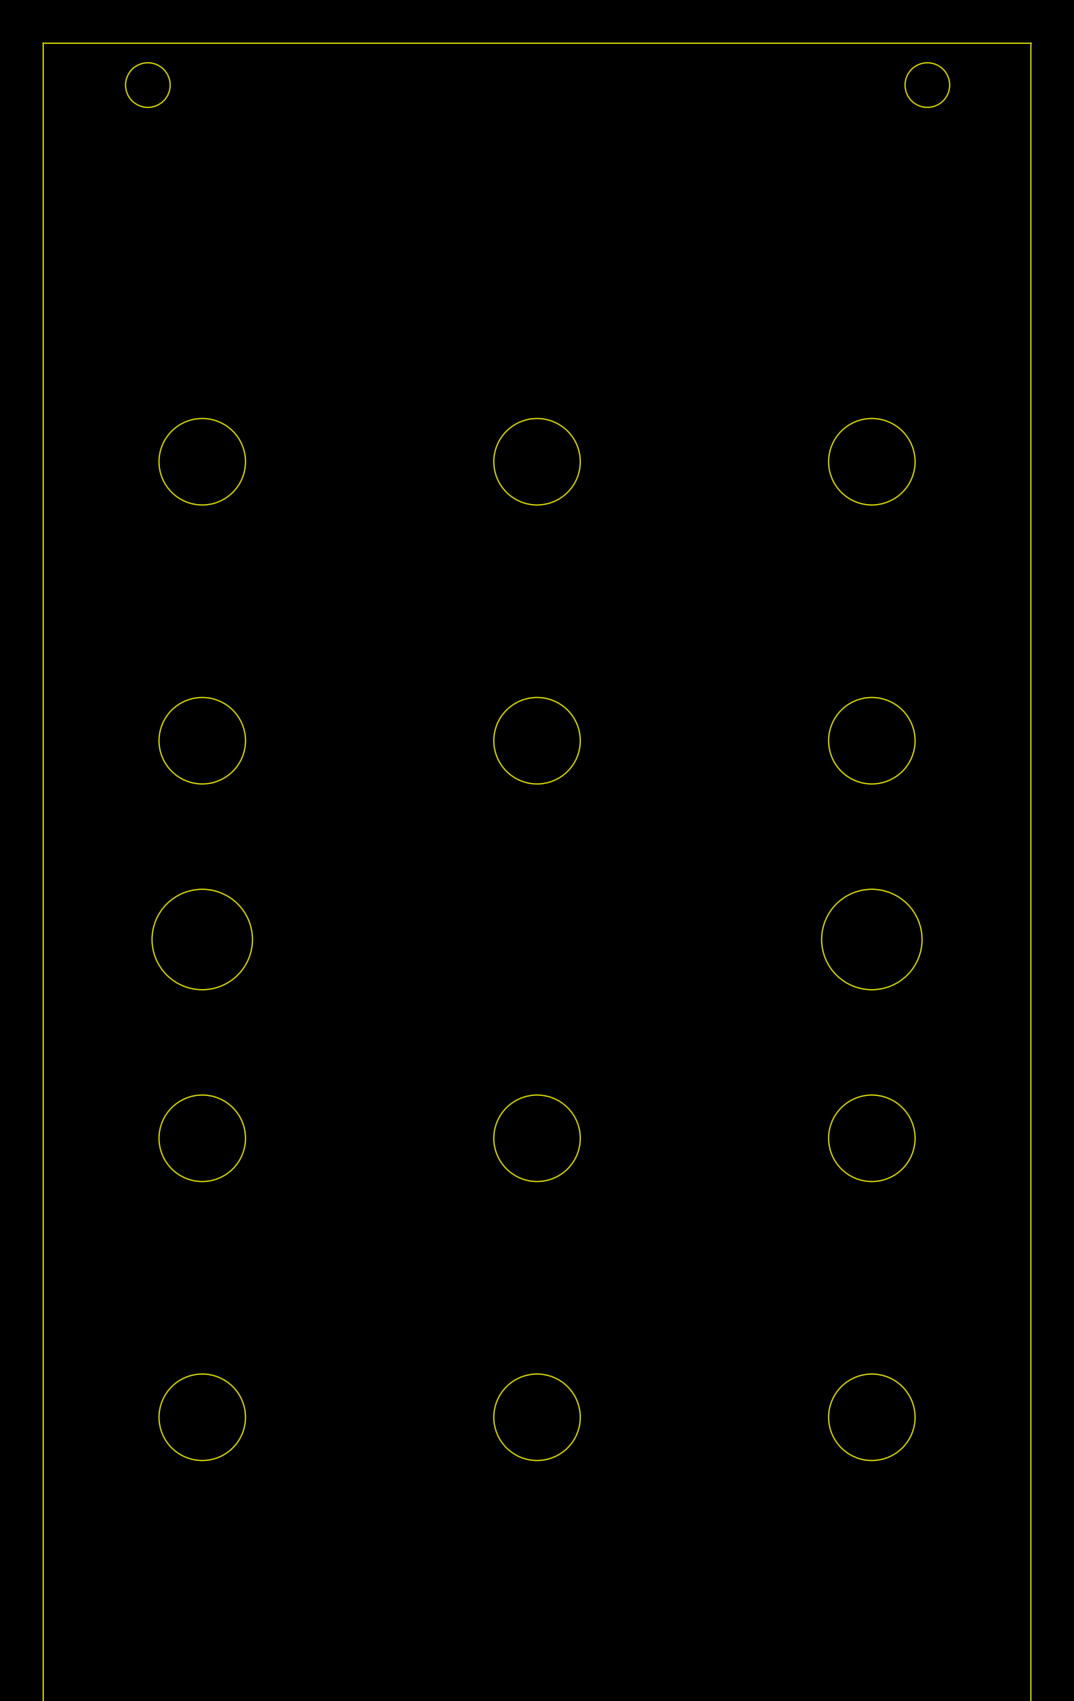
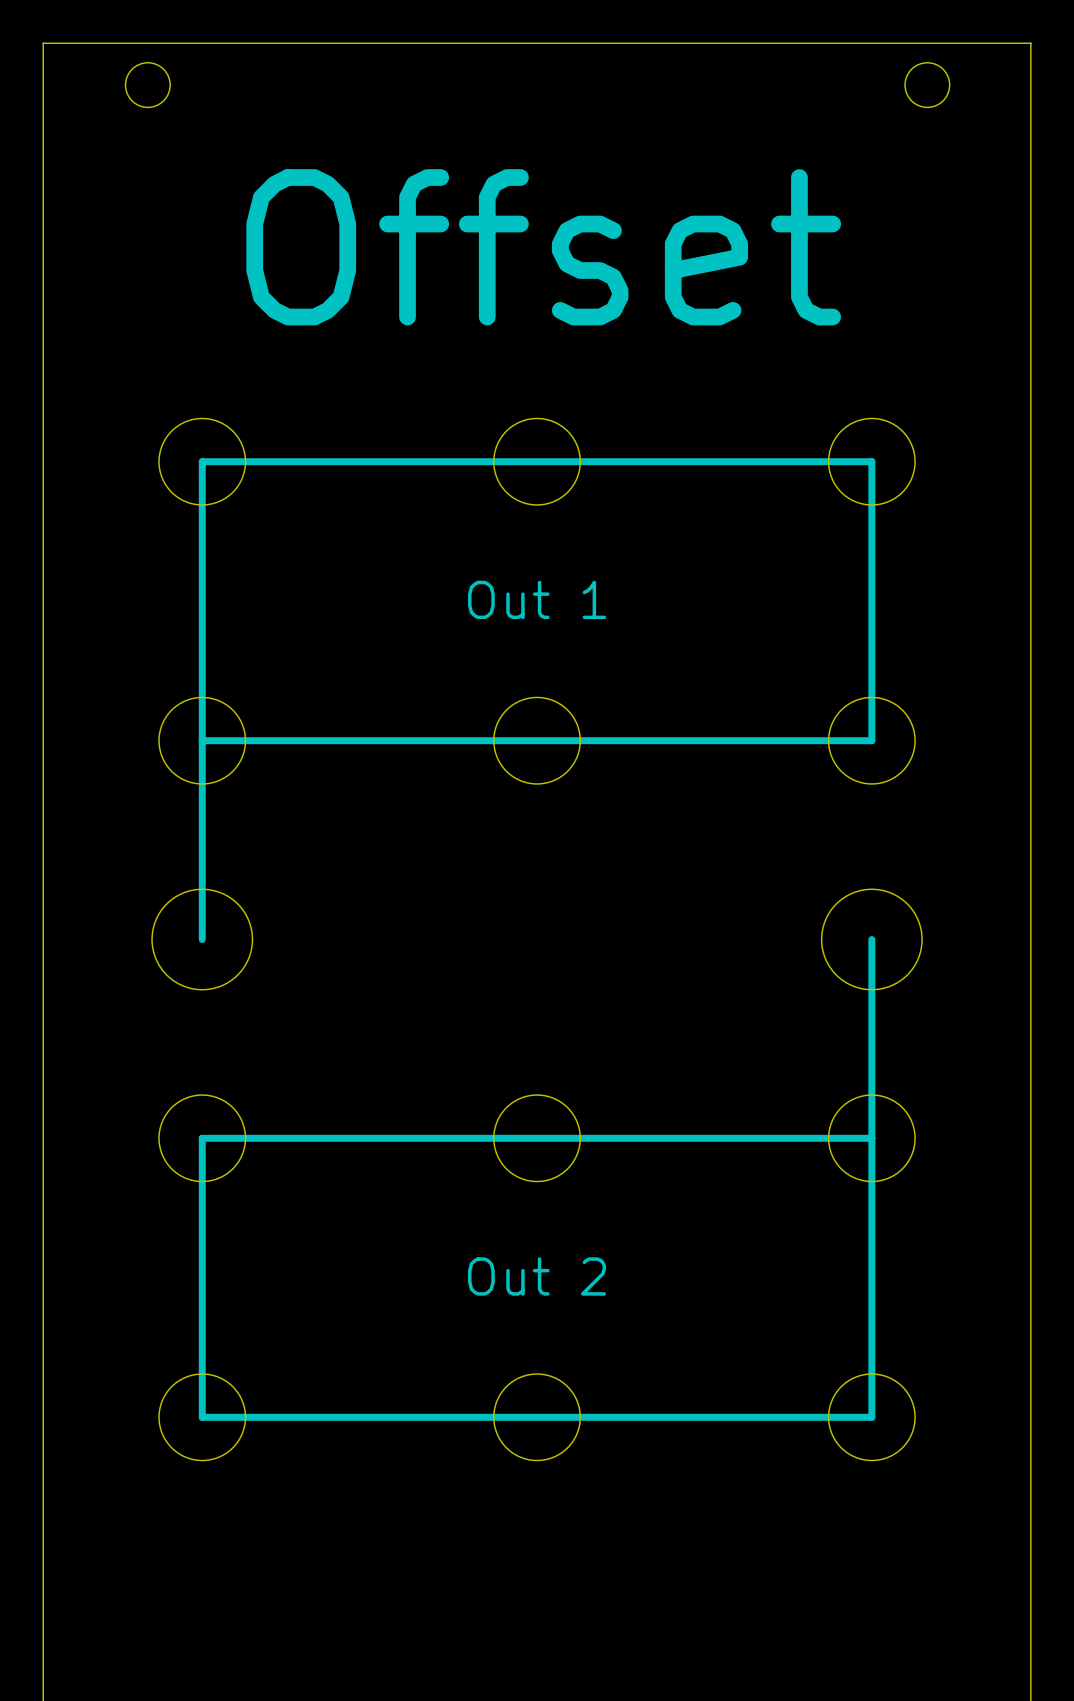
text: none -> Offset (543, 247)
text: none -> Out 1 (537, 599)
line: none -> (202, 740) (871, 740) (871, 461) (202, 461) (202, 939)
line: none -> (871, 939) (871, 1417) (202, 1417) (202, 1138) (871, 1138)
text: none -> Out 2 (537, 1276)

